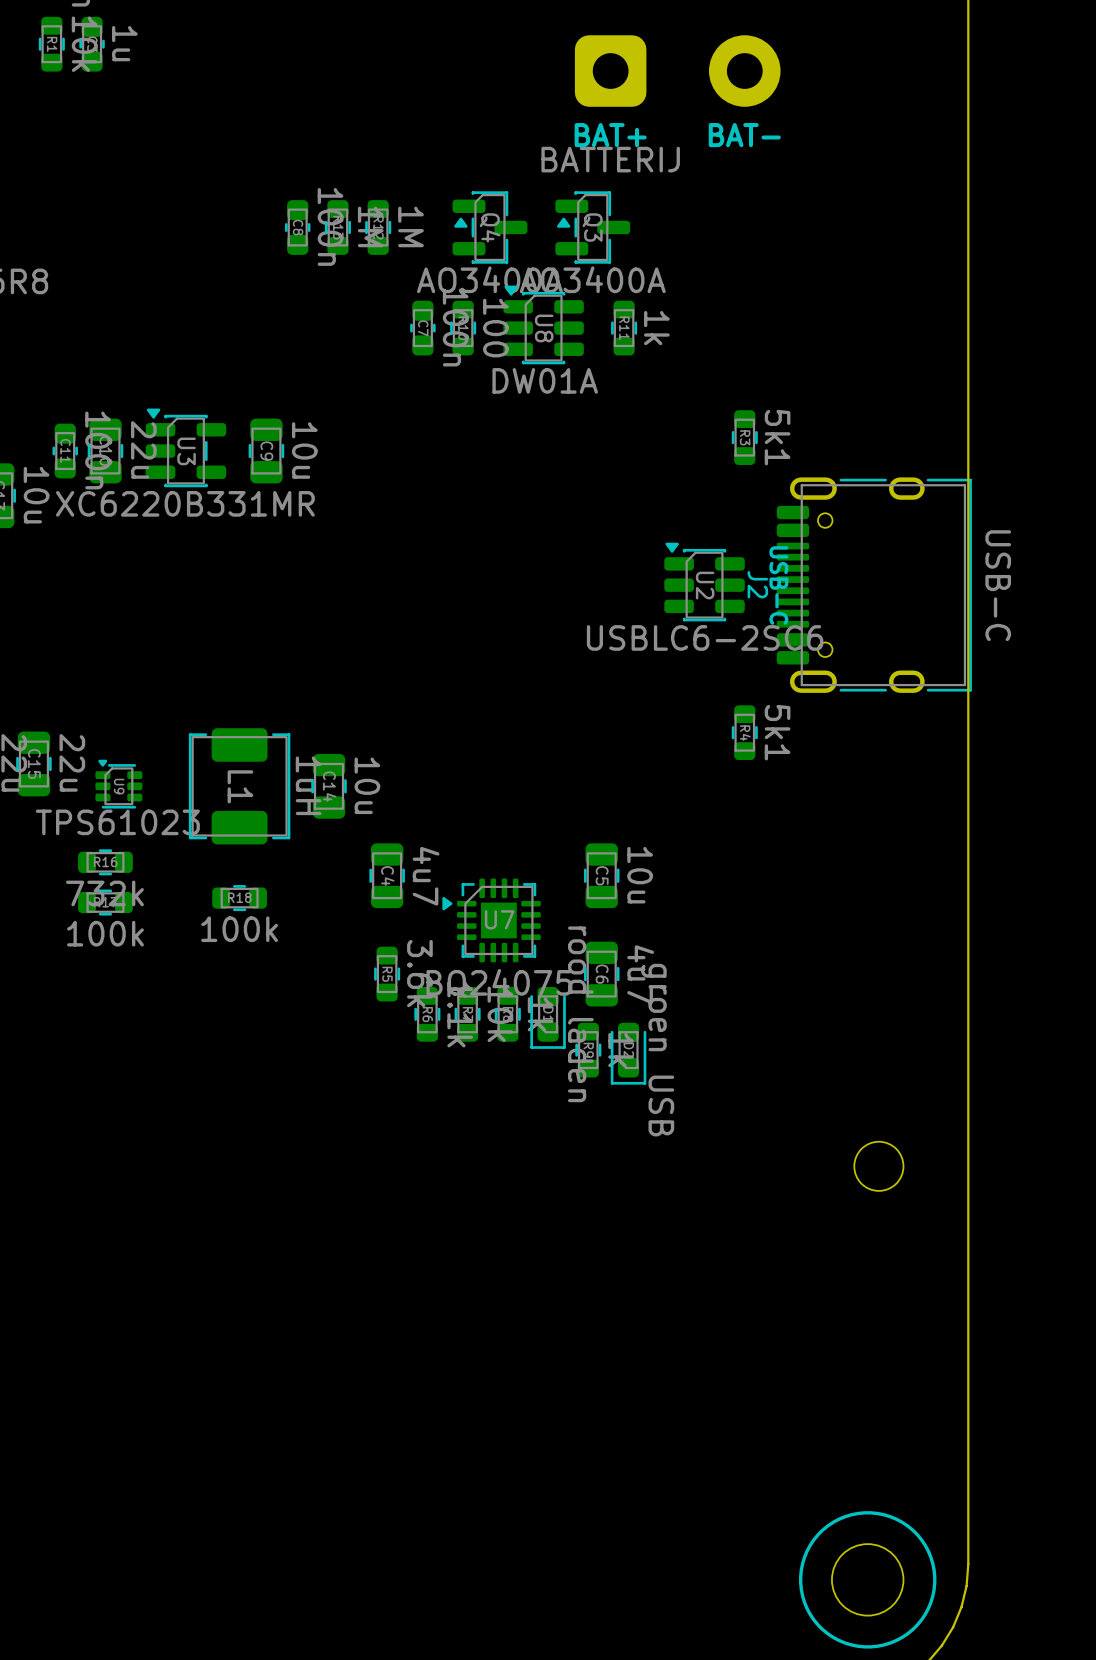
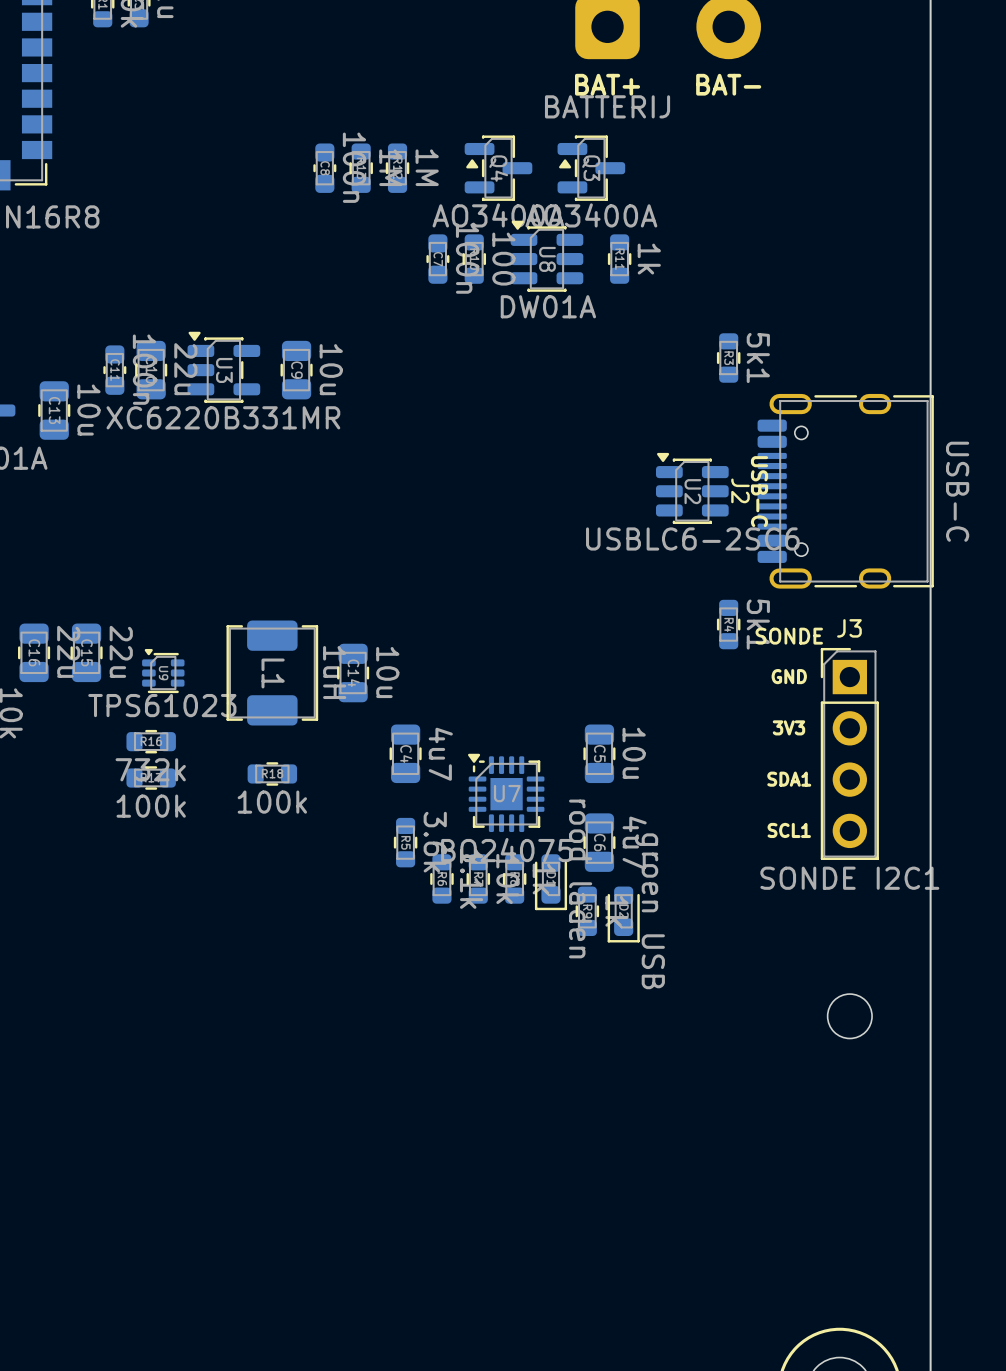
text: none -> SONDE (789, 636)
text: none -> GND (789, 676)
text: none -> 3V3 (788, 727)
J3: none -> SONDE I2C1 (849, 753)
U7 footprint: [442, 878, 541, 963] -> [468, 753, 545, 833]
text: none -> SDA1 (789, 779)
text: none -> SCL1 (789, 830)

